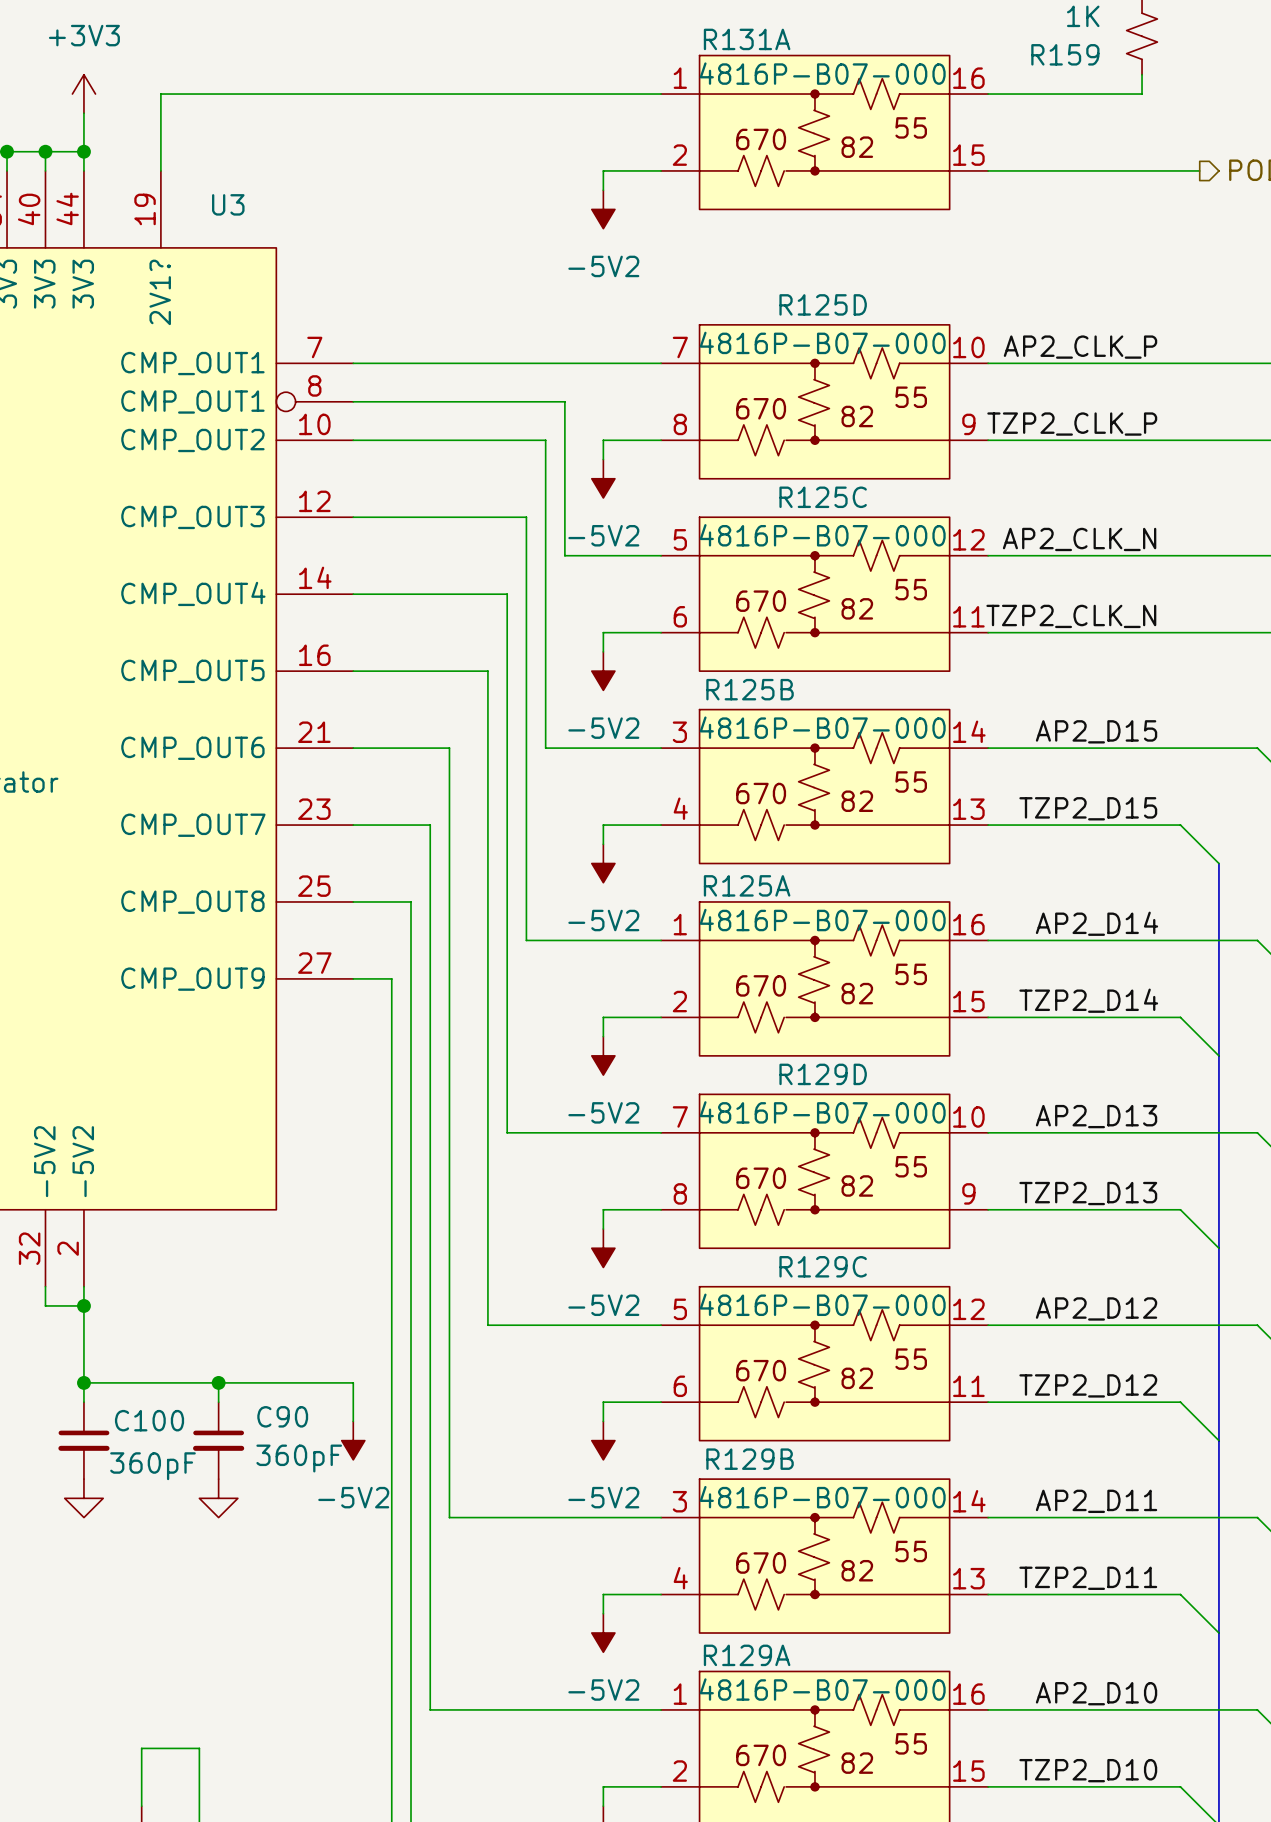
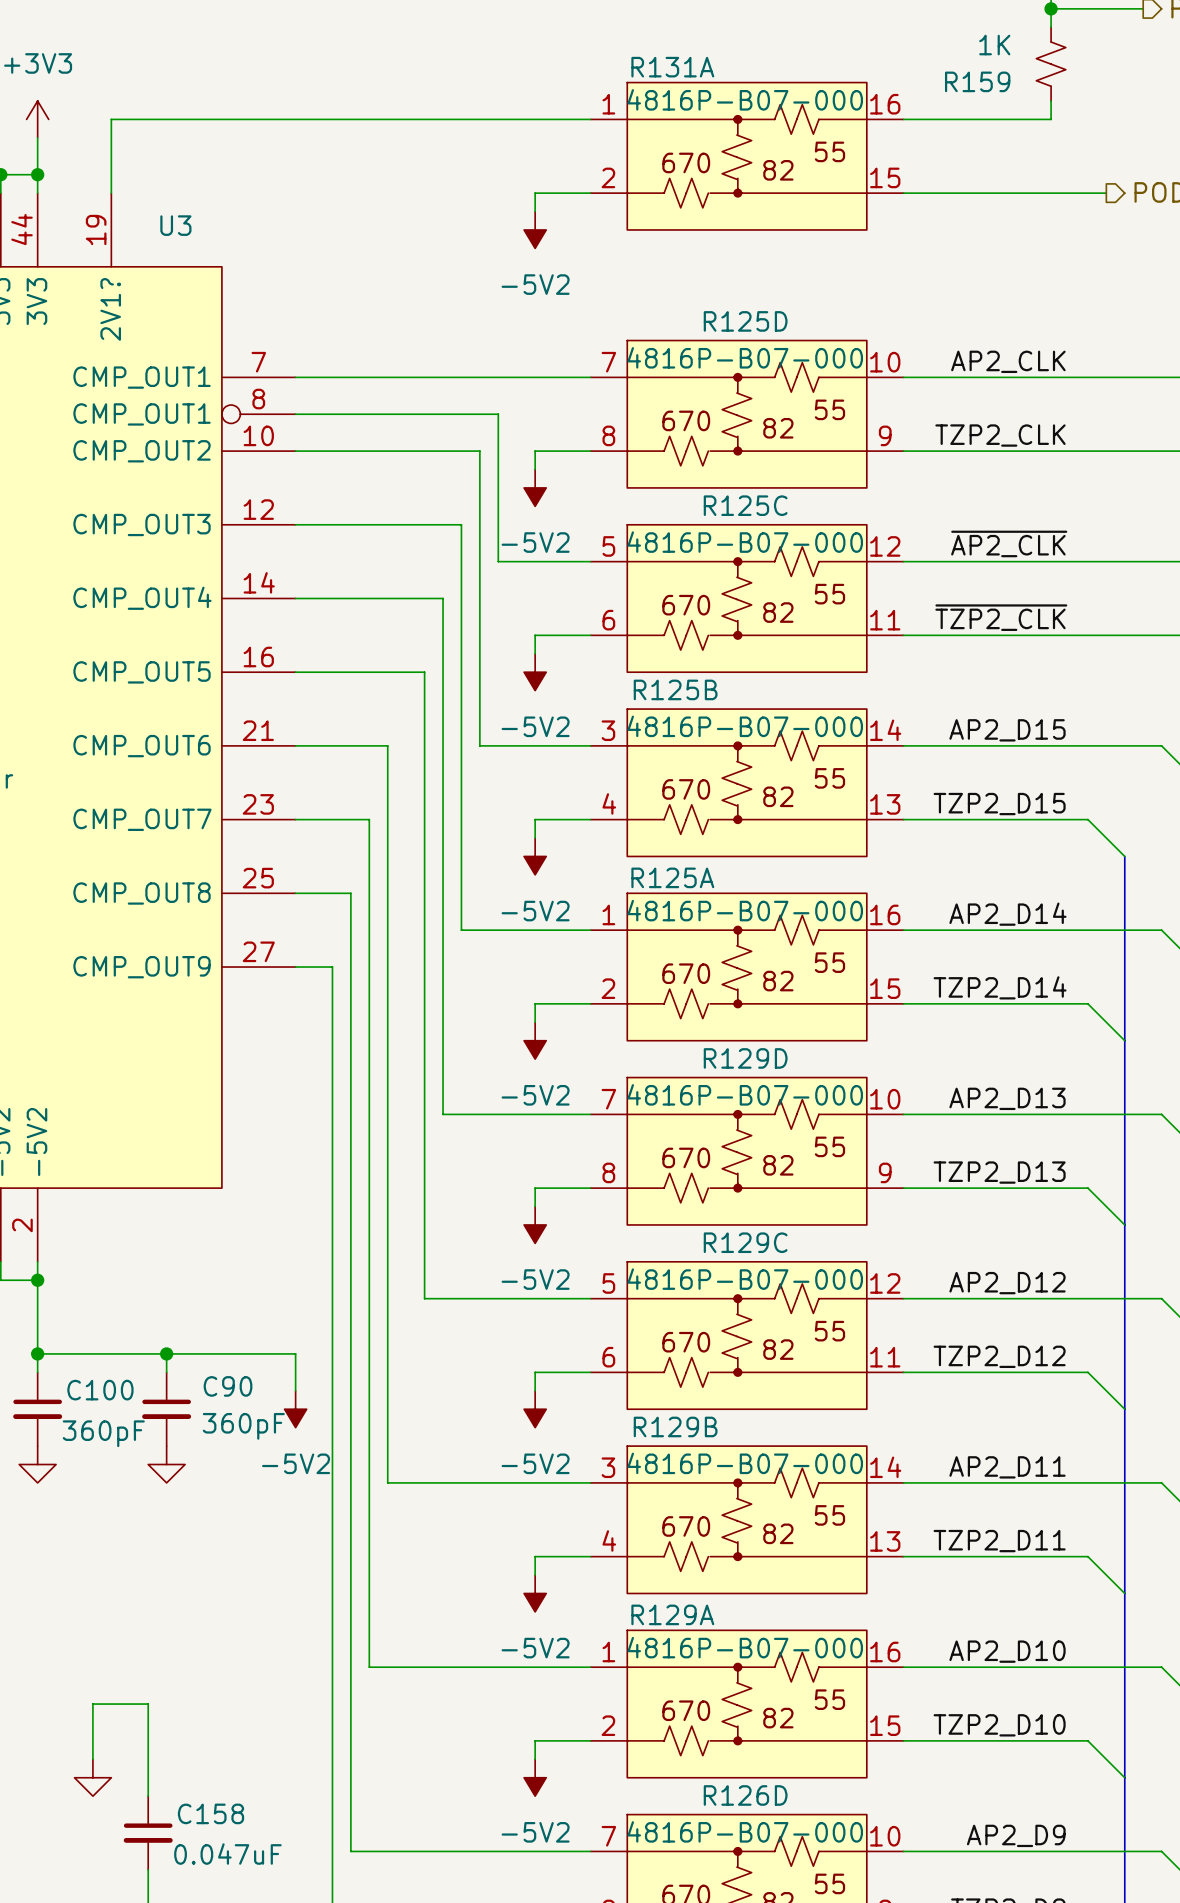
label: AP2_CLK_P (1080, 347) -> AP2_CLK (1008, 361)
label: TZP2_CLK_P (1072, 424) -> TZP2_CLK (1000, 435)
label: AP2_CLK_N (1079, 539) -> ~{AP2_CLK} (1009, 543)
label: TZP2_CLK_N (1071, 616) -> ~{TZP2_CLK} (1001, 617)

